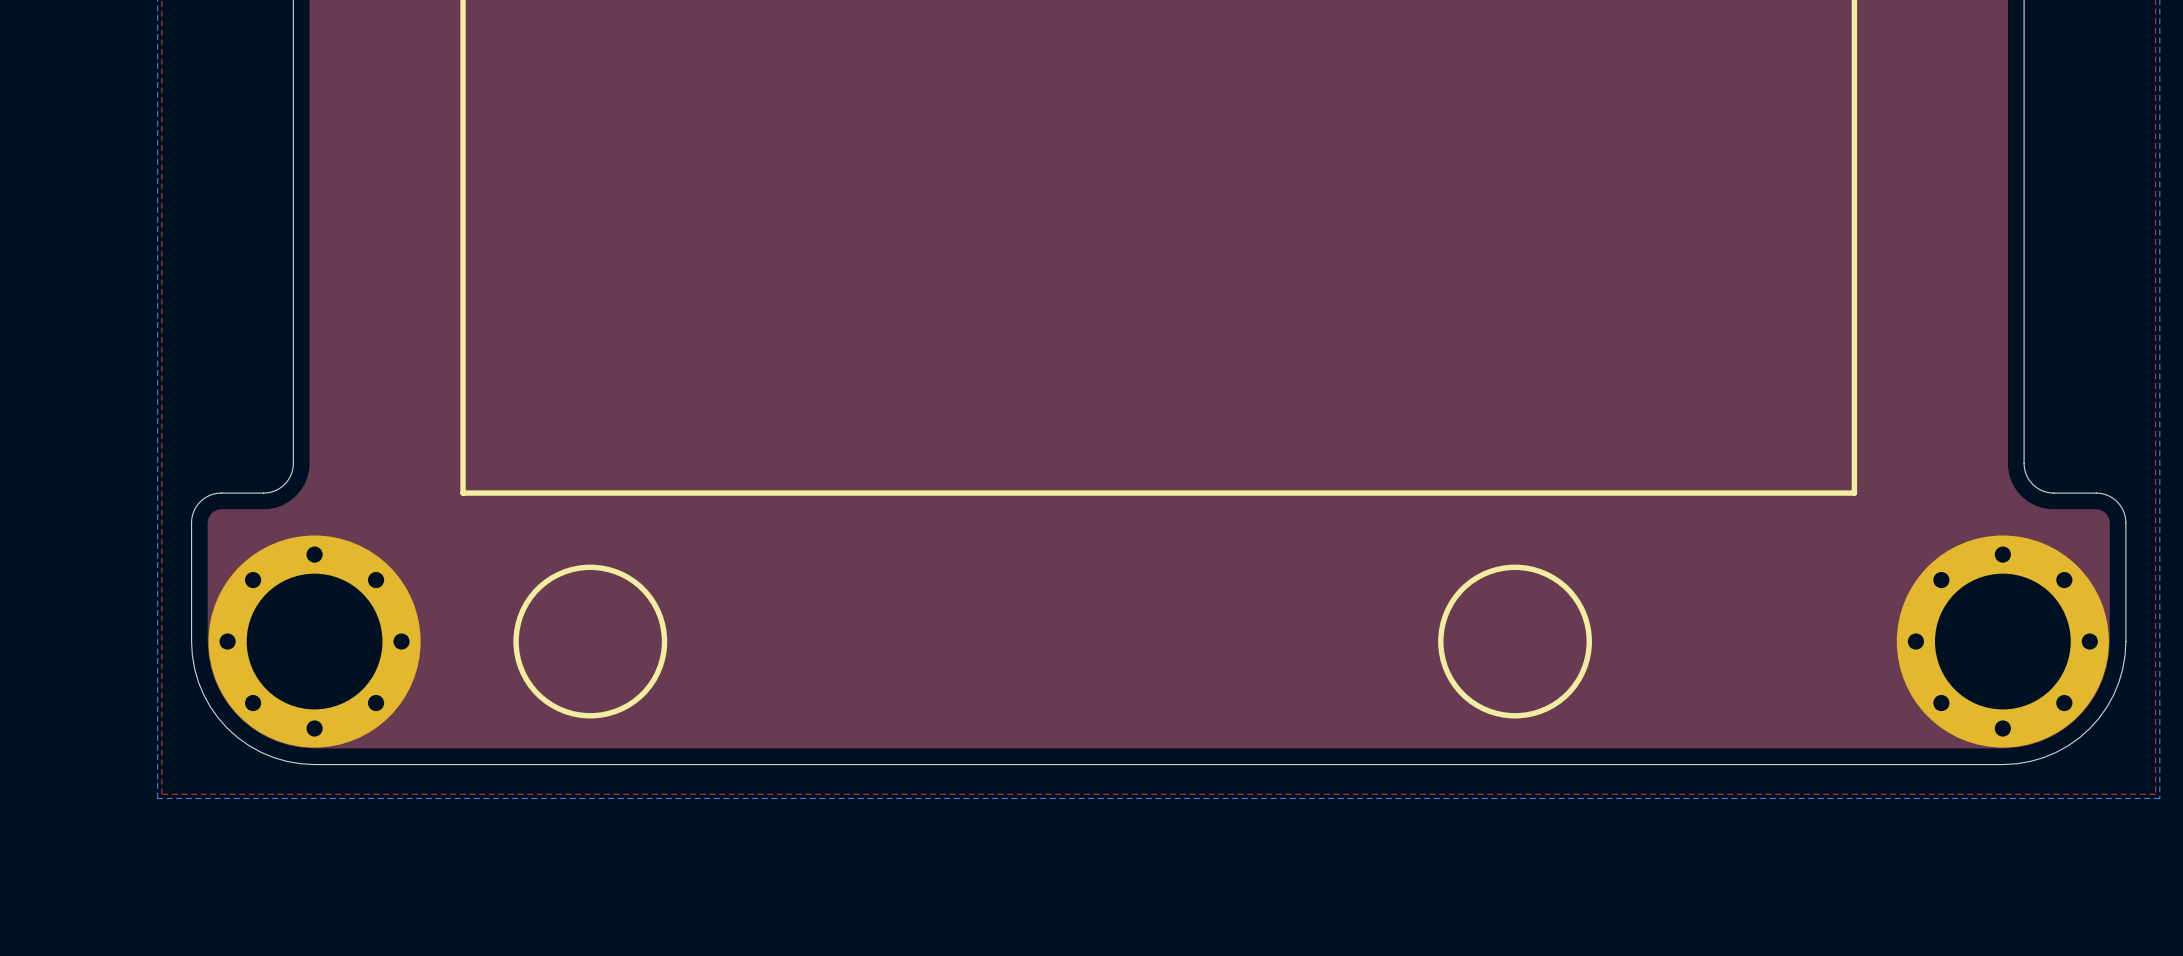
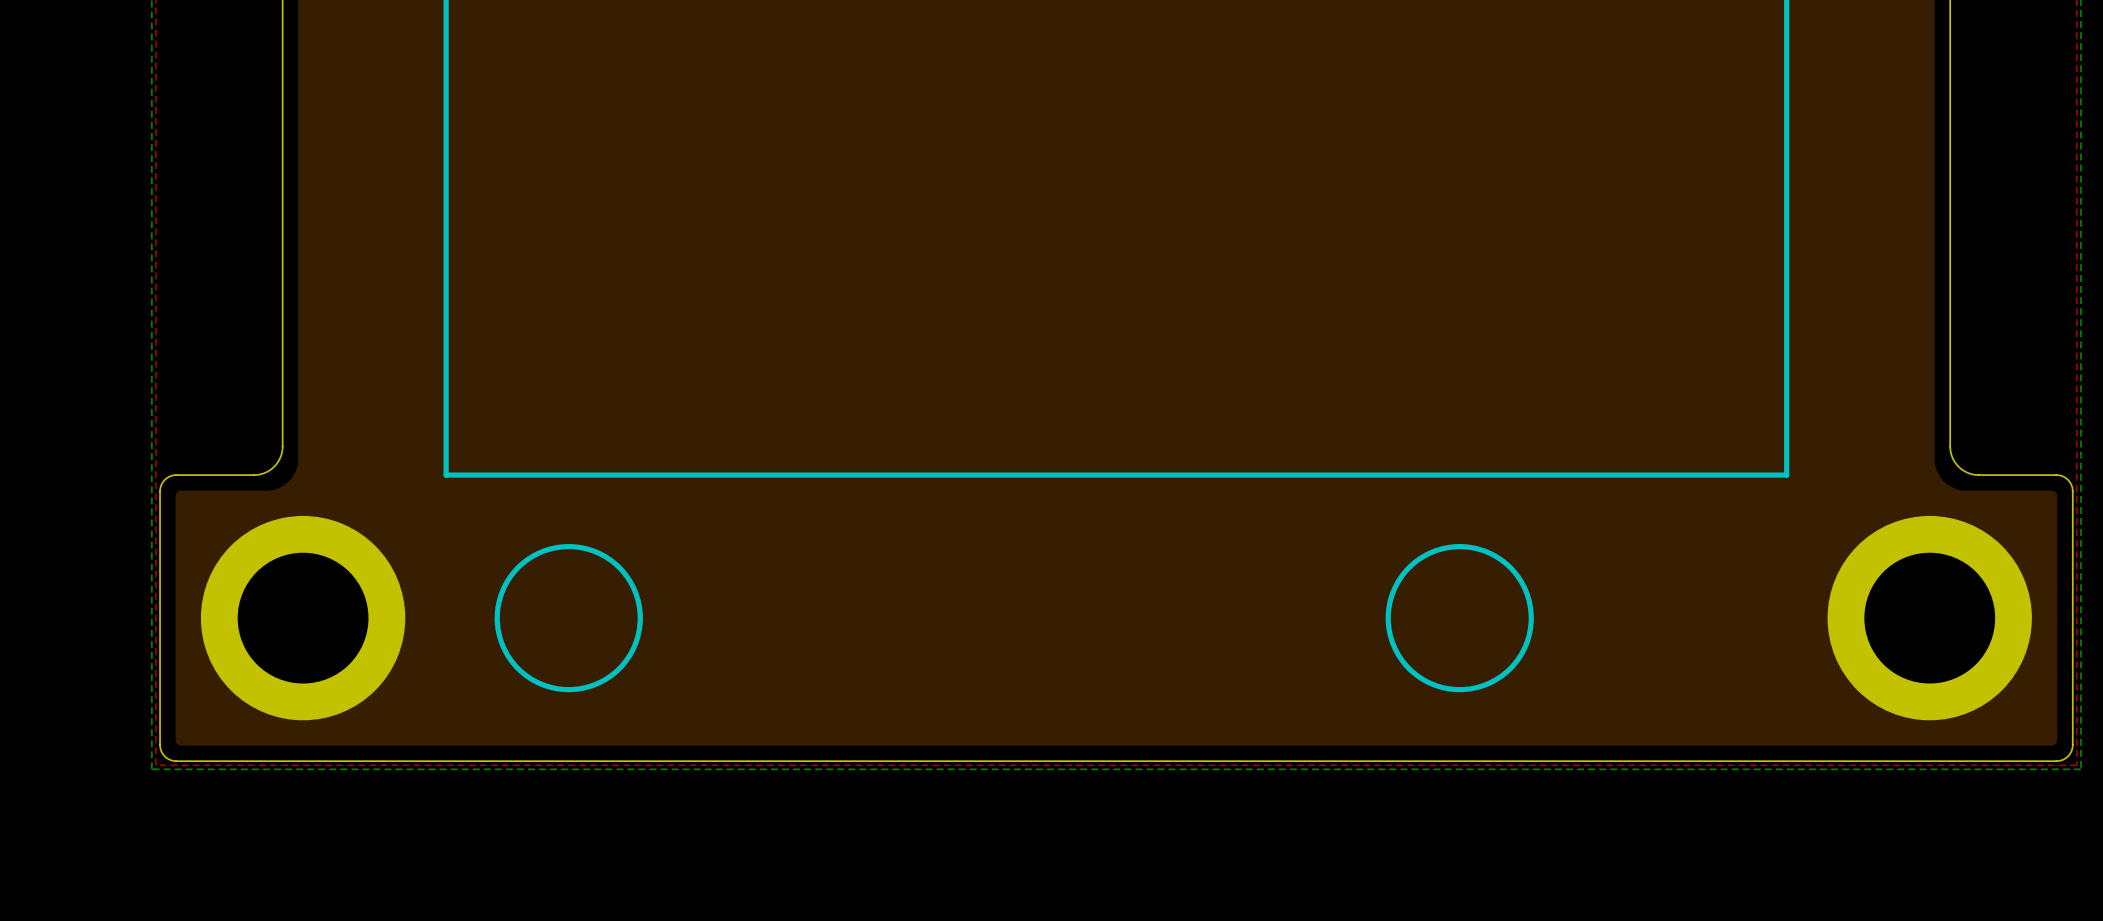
board edge: (221, 493) (208, 496) (200, 501) (194, 509) (191, 519) (191, 641) (194, 668) (198, 682) (210, 706) (218, 718) (227, 728) (249, 745) (273, 757) (300, 763) (314, 764) (2016, 763) (2030, 761) (2056, 752) (2079, 737) (2089, 728) (2107, 706) (2118, 682) (2125, 655) (2125, 641) (2125, 519) (2122, 509) (2117, 501) (2105, 494) (2096, 493) -> (213, 475) (172, 475) (164, 479) (160, 489) (160, 744) (163, 754) (174, 761) (2058, 761) (2069, 755) (2072, 744) (2072, 489) (2068, 479) (2060, 475) (2019, 475)
part footprint: [208, 535, 421, 748] -> [200, 515, 406, 721]
part footprint: [1896, 535, 2109, 748] -> [1827, 515, 2032, 721]

